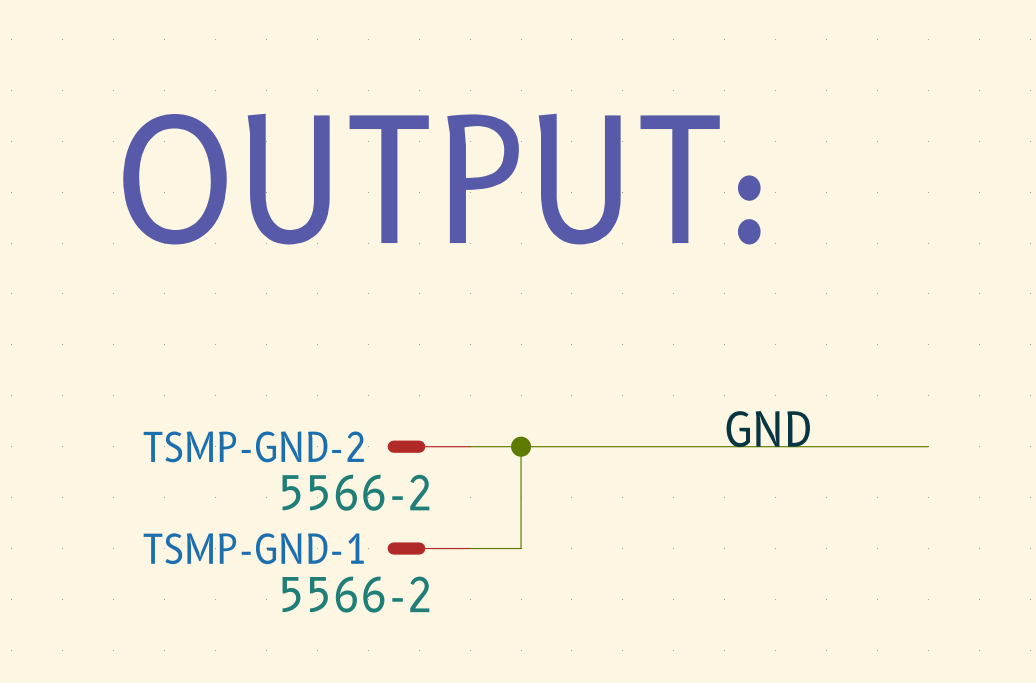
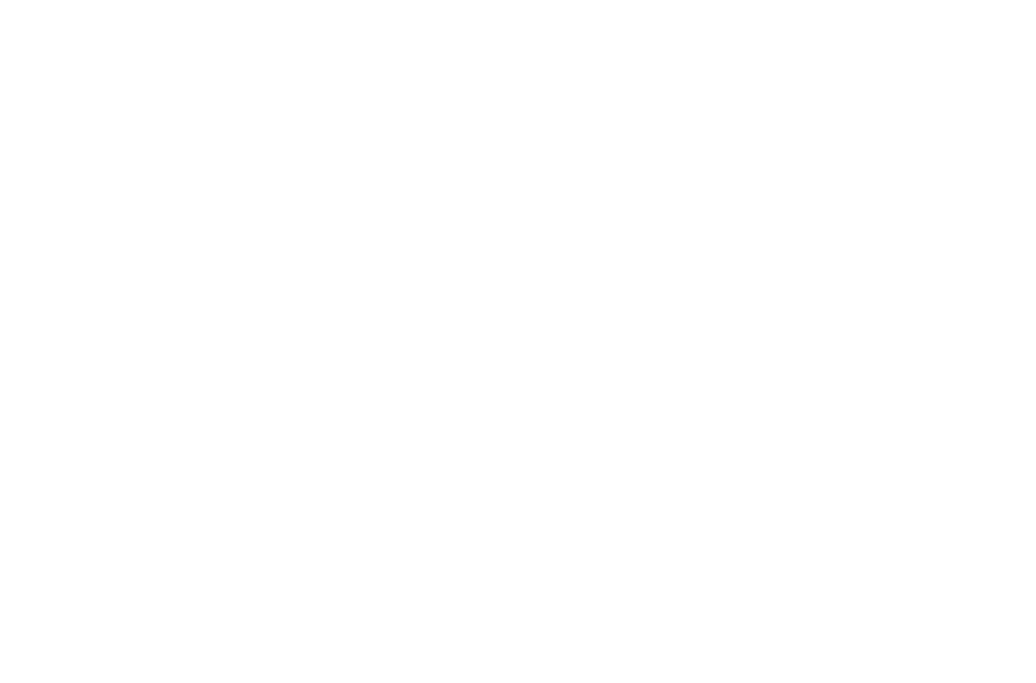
text: OUTPUT: (441, 179) -> none
label: GND (768, 429) -> none
TSMP-GND-2: 5566-2 (428, 446) -> none
wire: (470, 446) (928, 446) -> none
wire: (521, 446) (521, 548) (470, 548) -> none
junction: (521, 446) -> none
TSMP-GND-1: 5566-2 (428, 548) -> none

